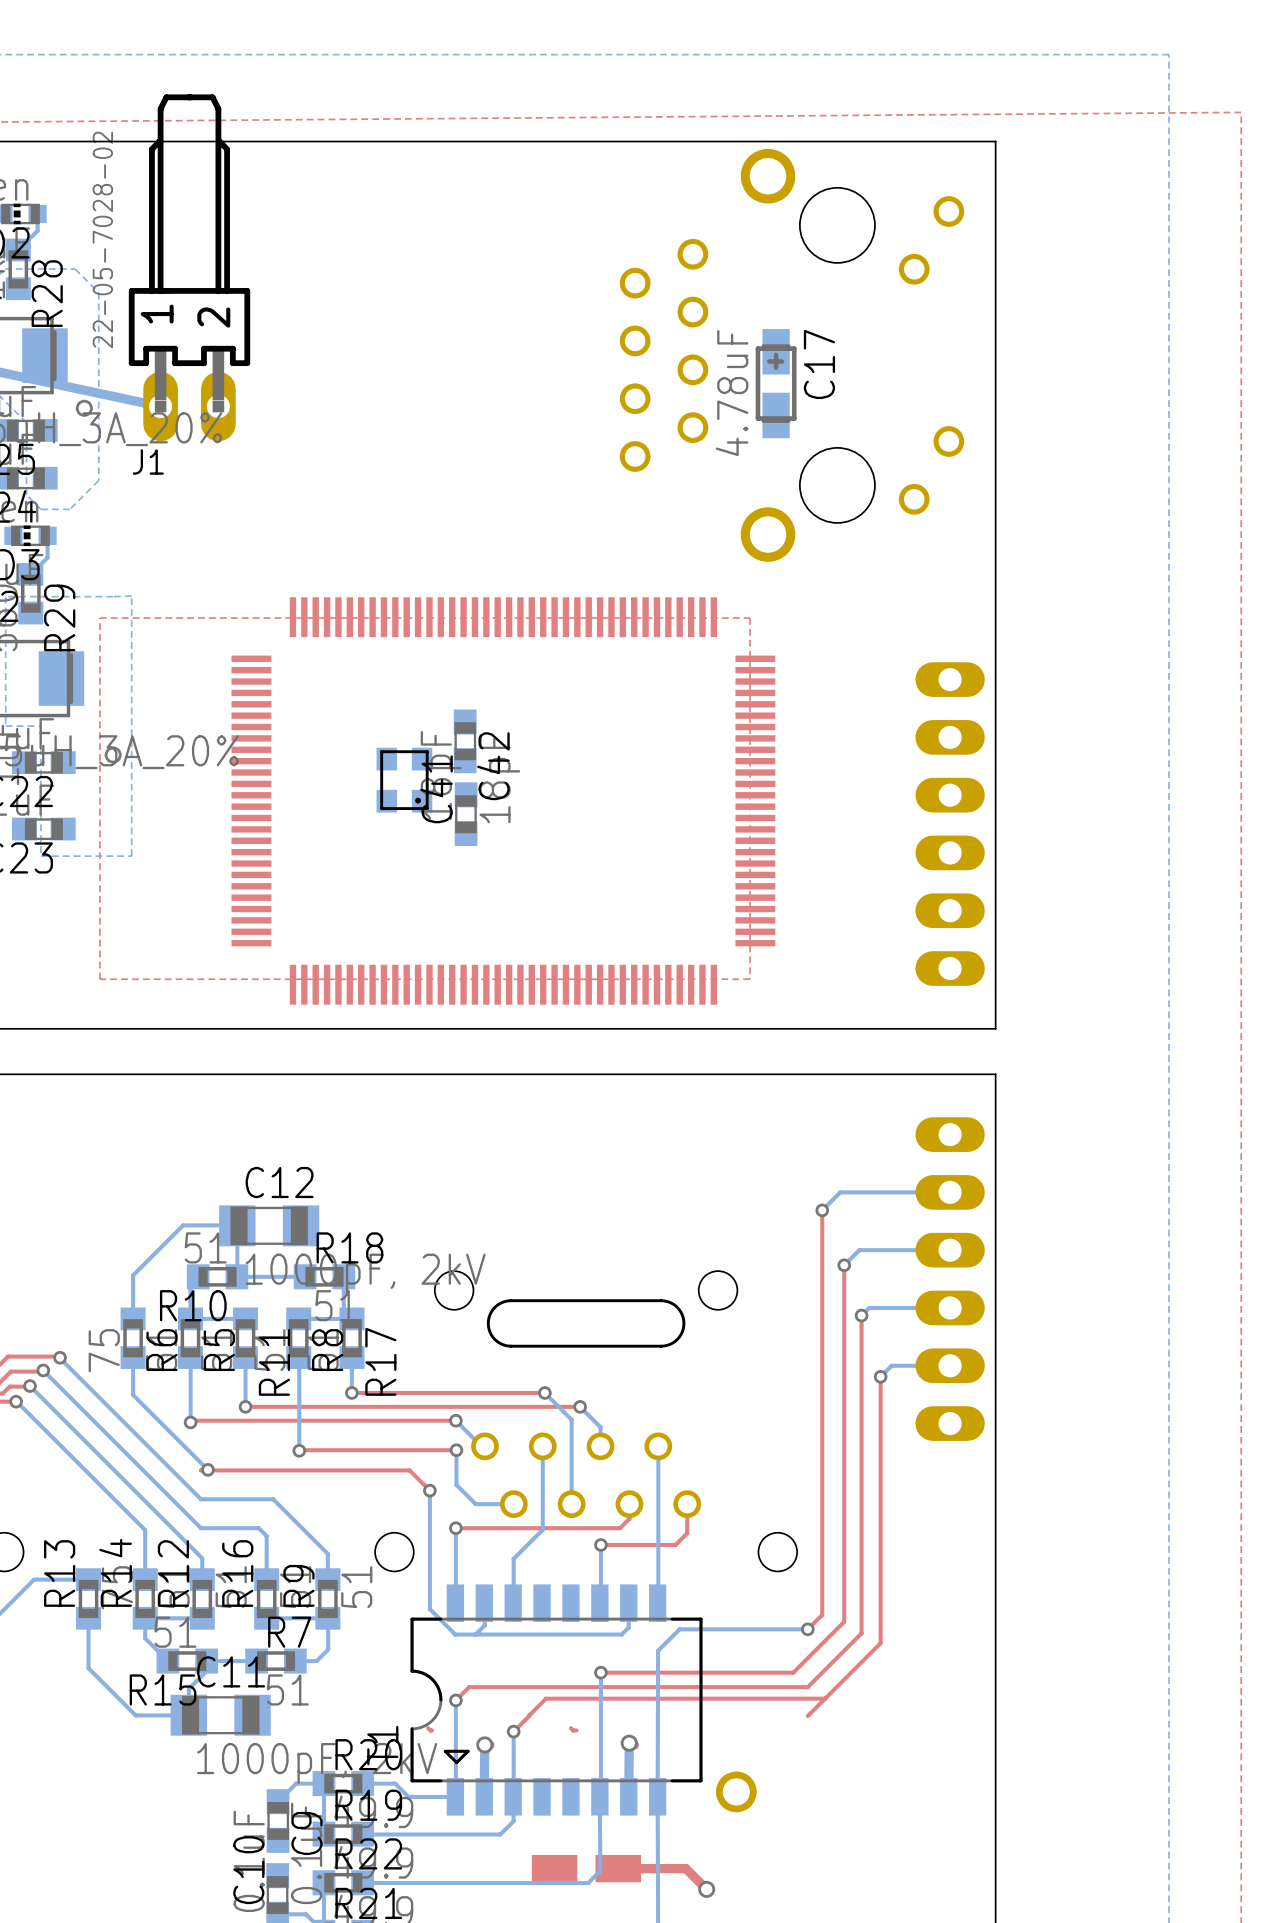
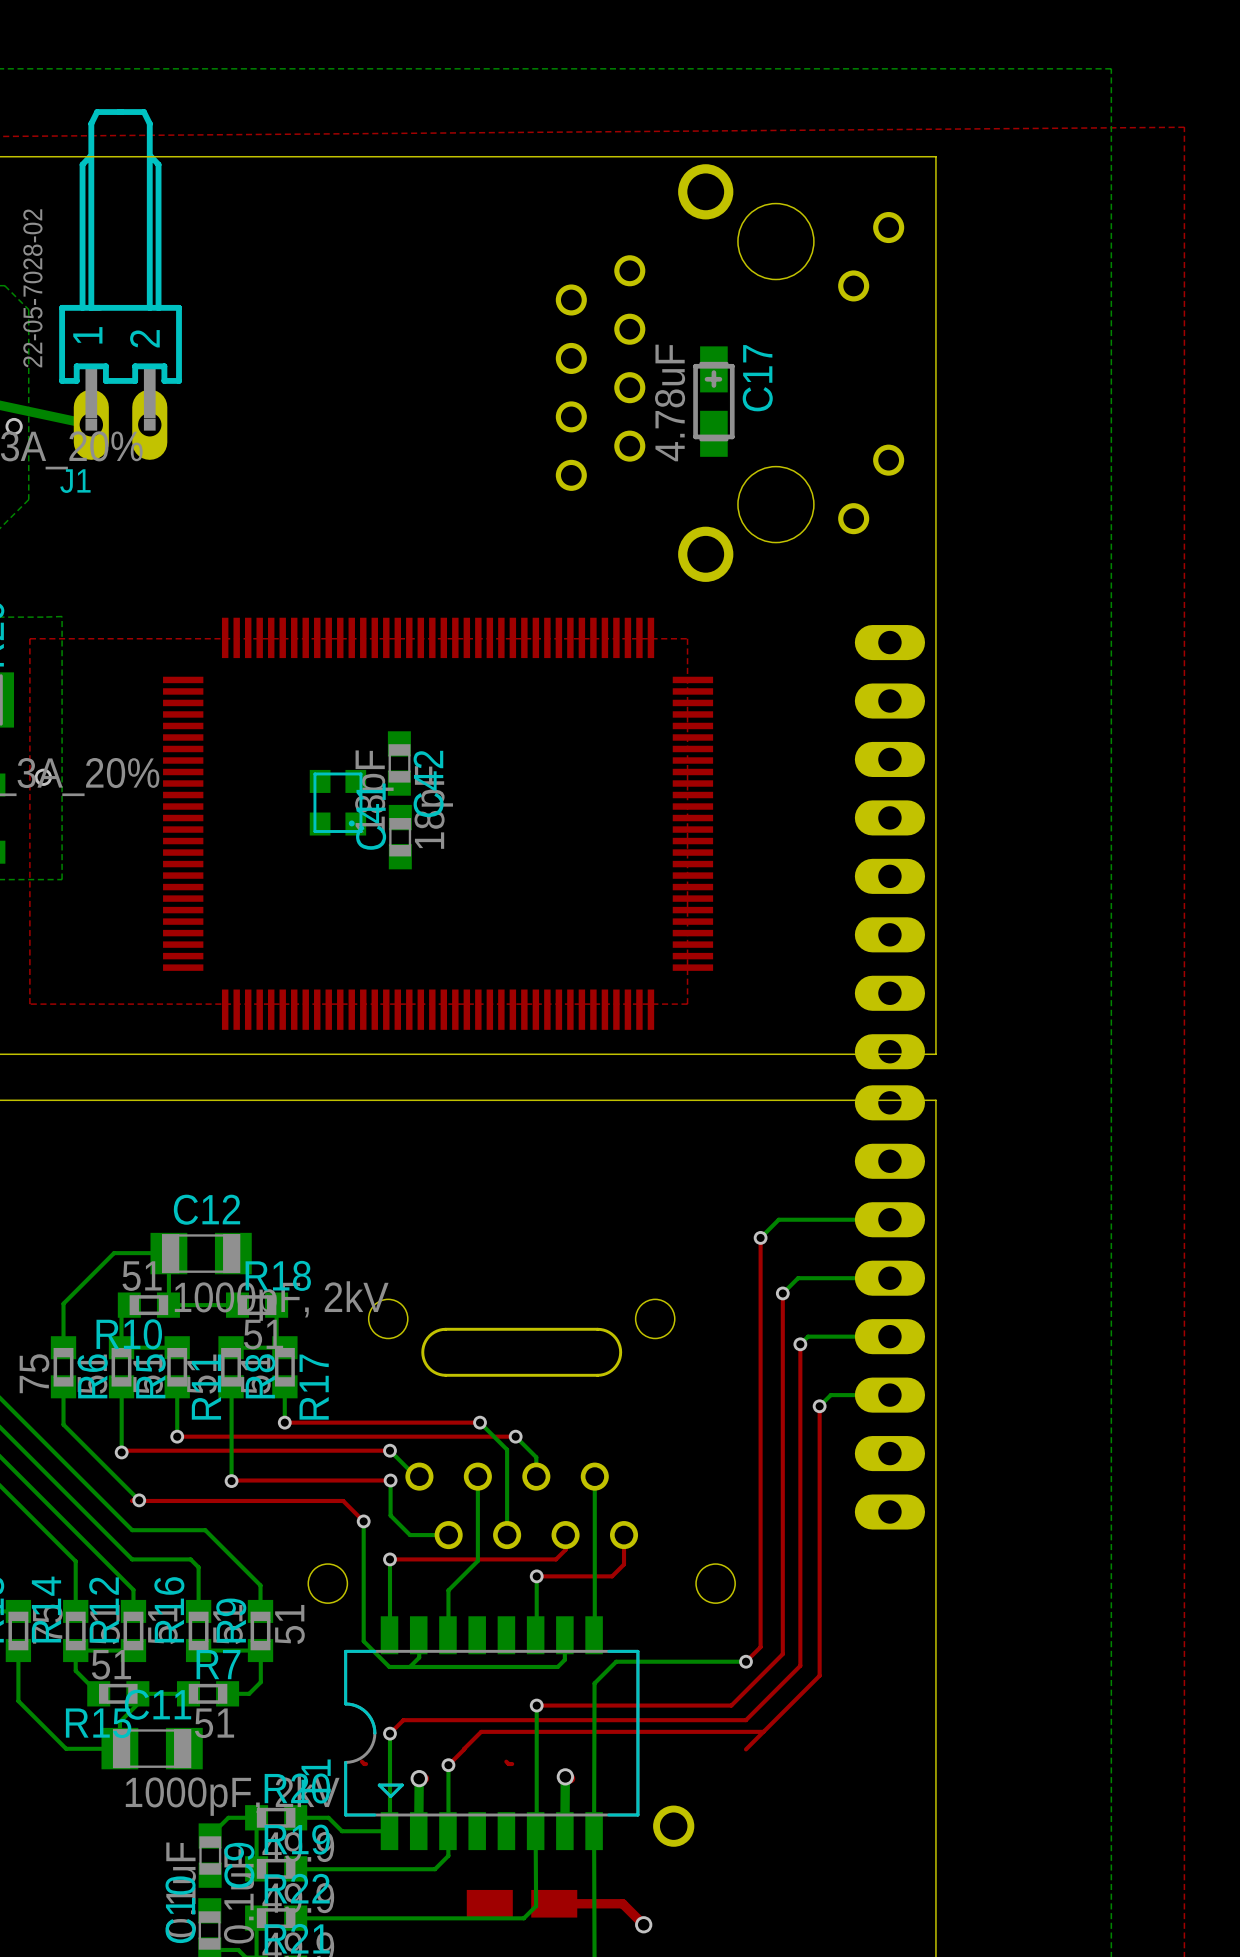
part footprint: [915, 662, 985, 986] -> [854, 625, 926, 1070]
part footprint: [915, 1117, 985, 1441] -> [854, 1085, 926, 1530]

